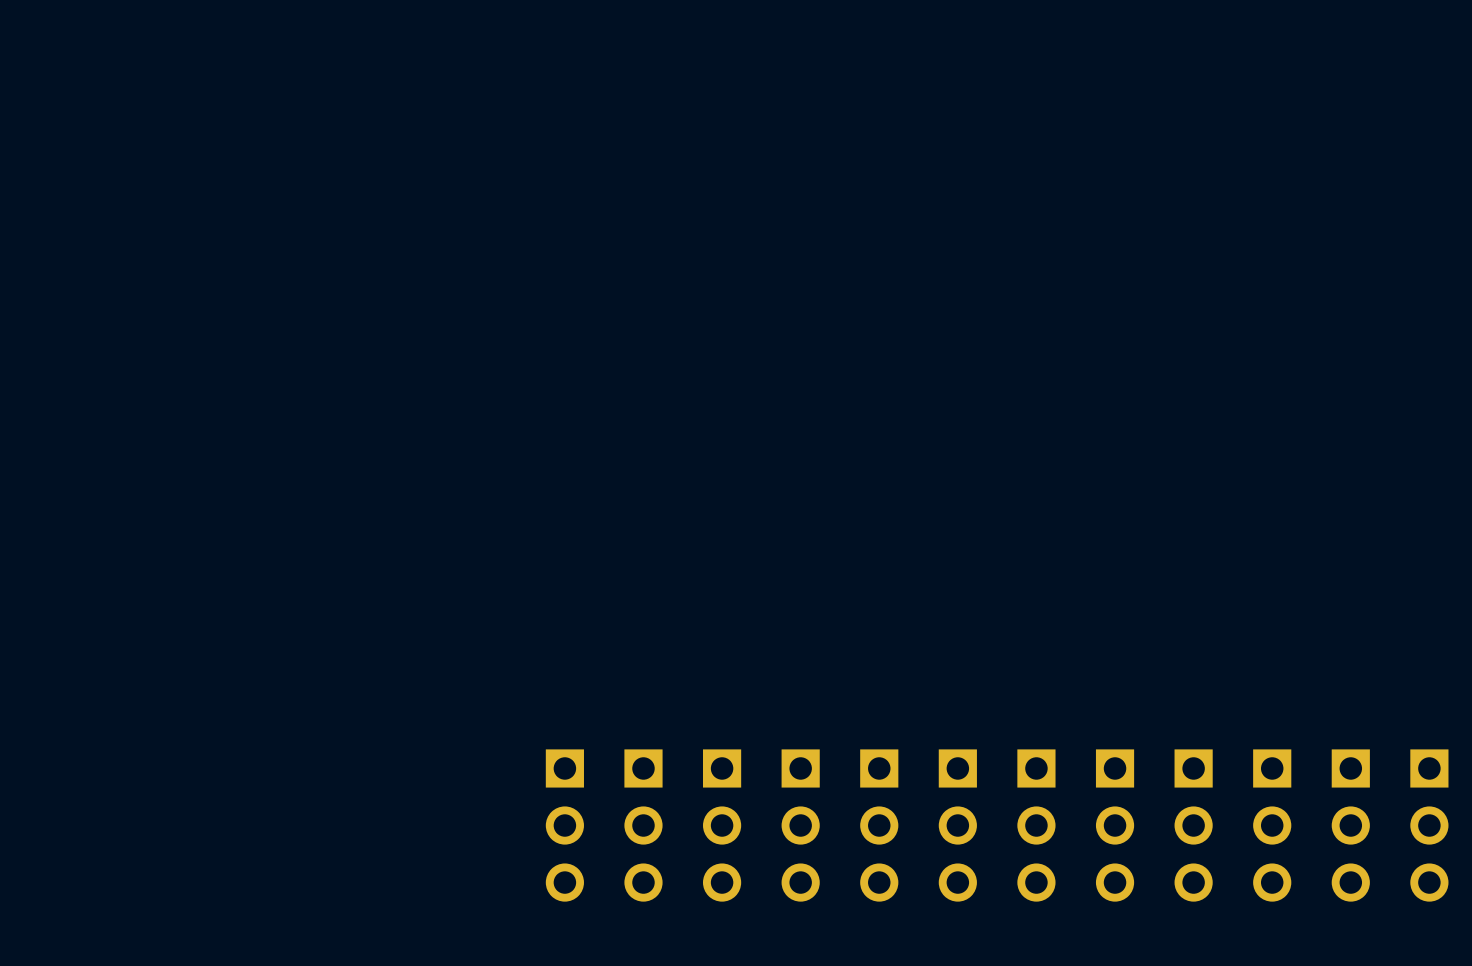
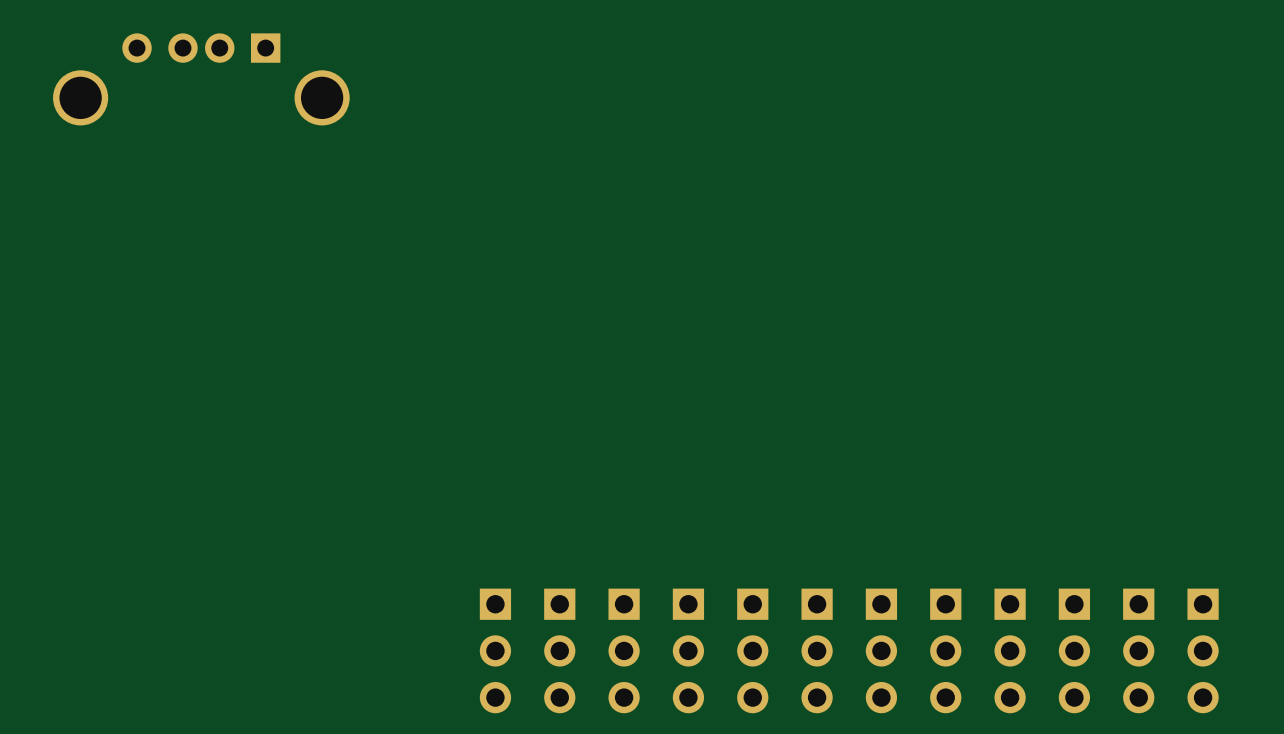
part: none -> (201, 79)

